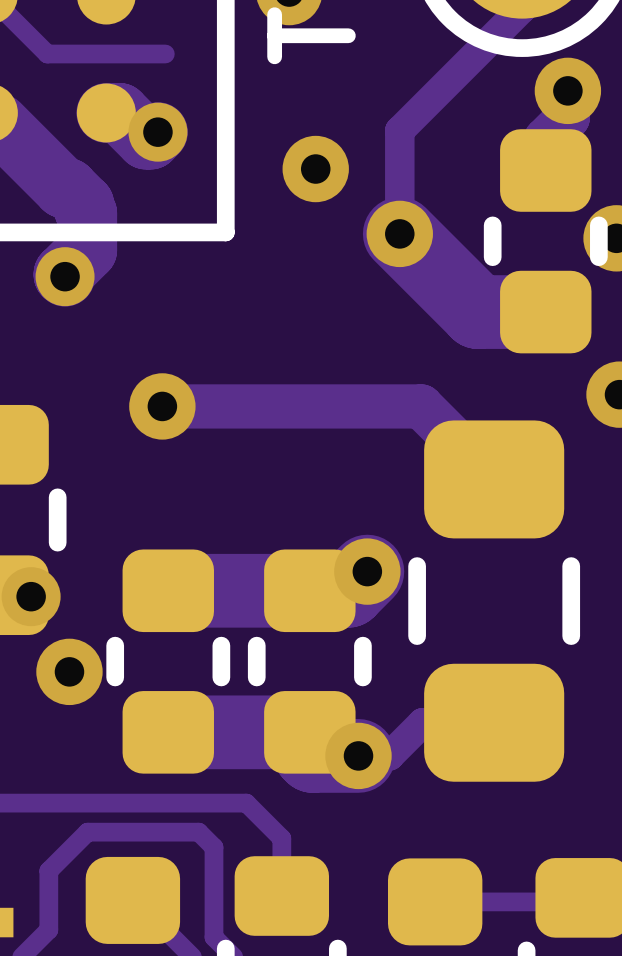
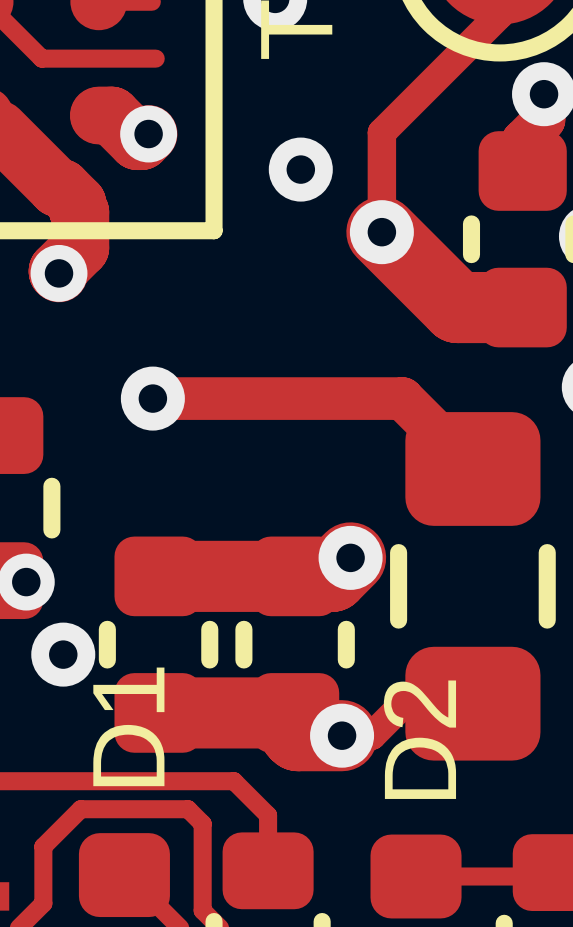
D1 name: none -> D1 (128, 726)
D2 name: none -> D2 (419, 739)

